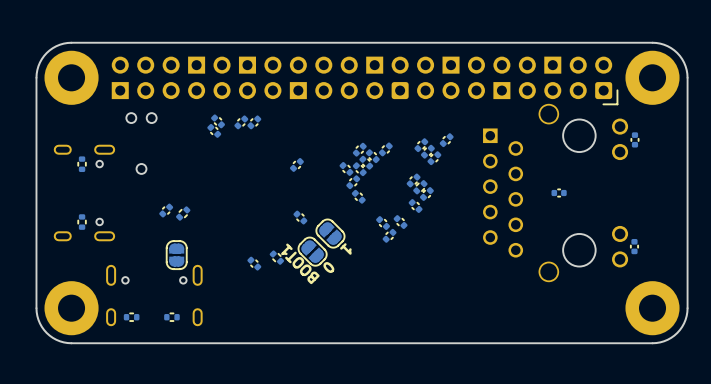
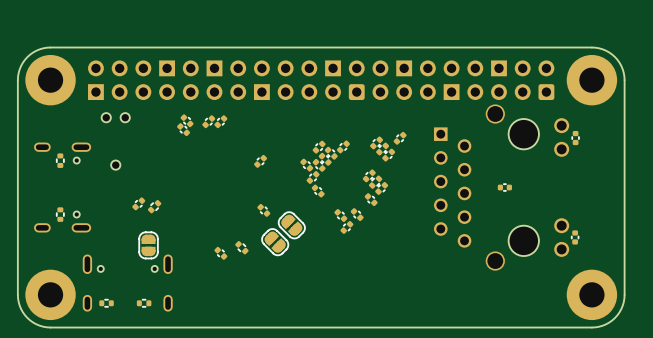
line: (617, 90) (617, 104) (603, 104) -> none
text: 1 (345, 248) -> none
text: BOOT1 (300, 263) -> none
text: 0 (328, 267) -> none

